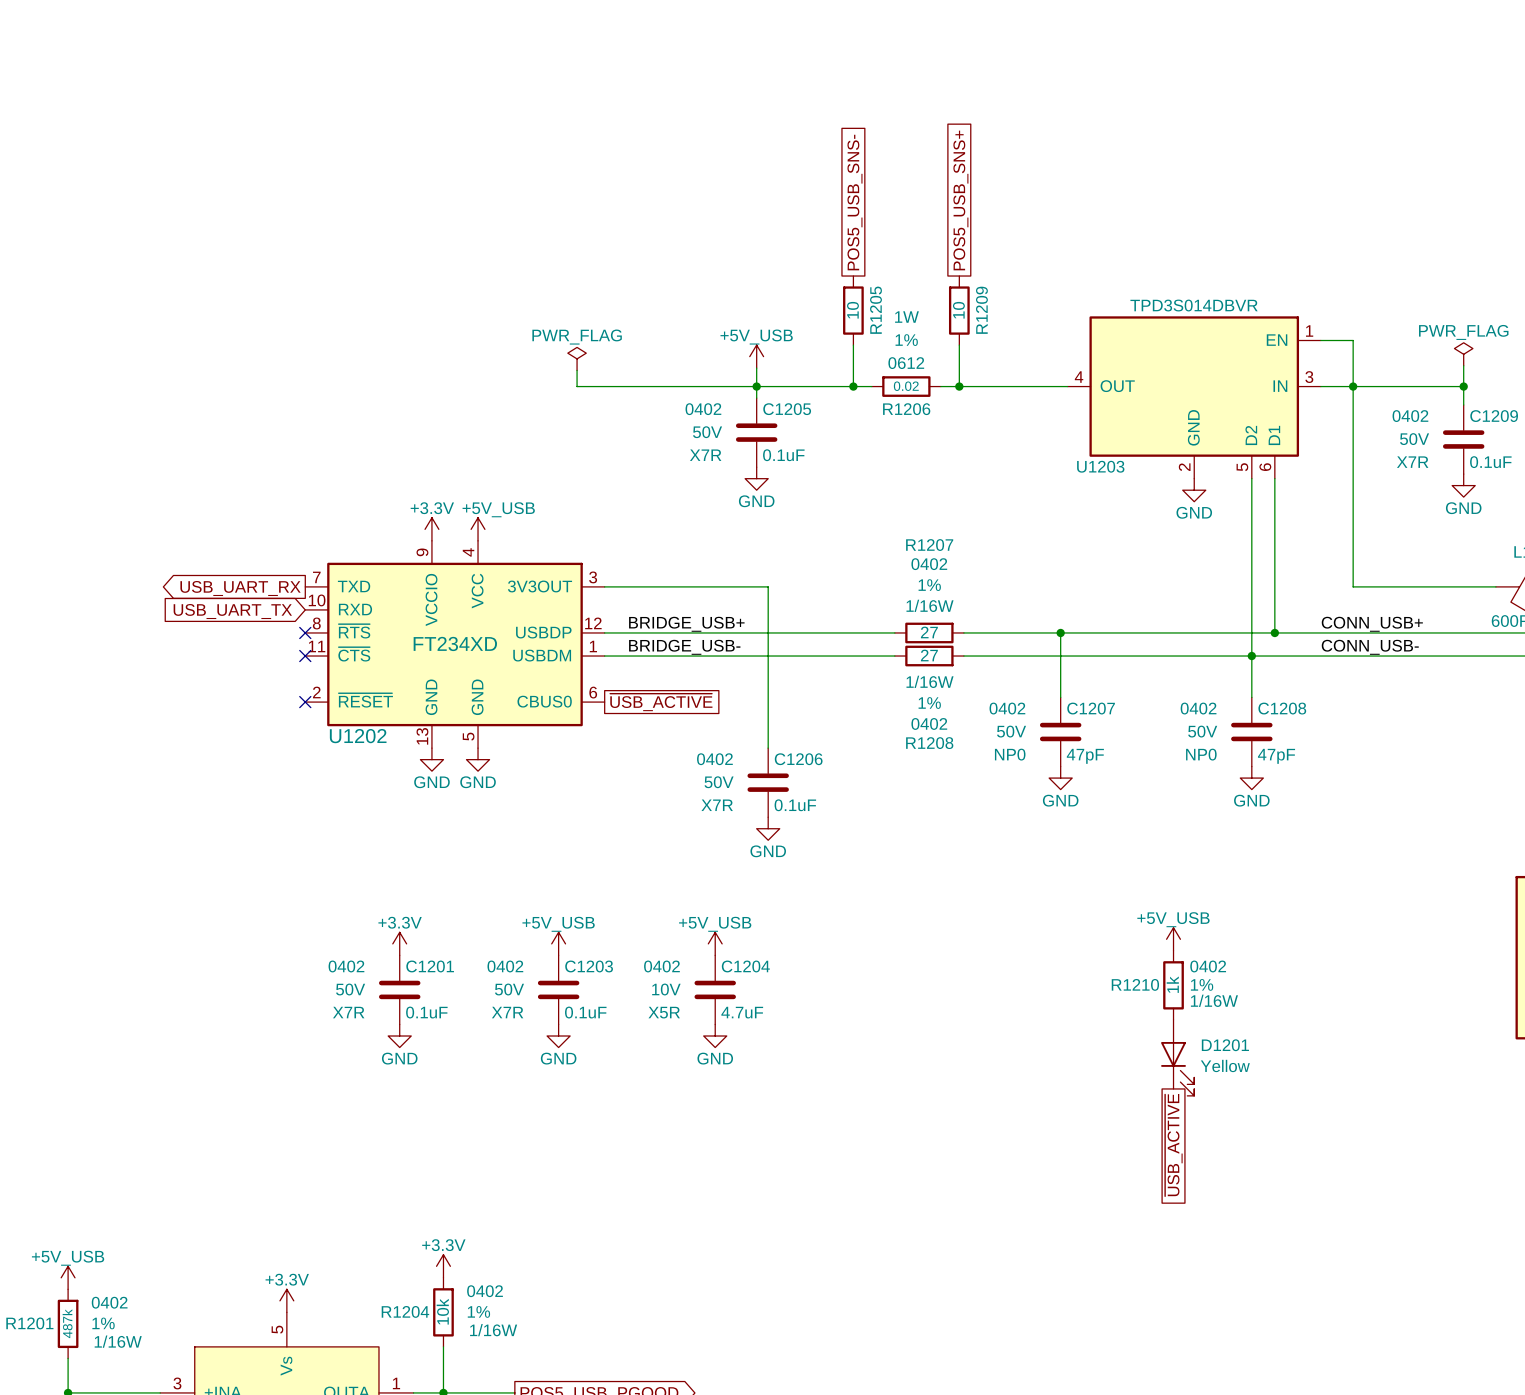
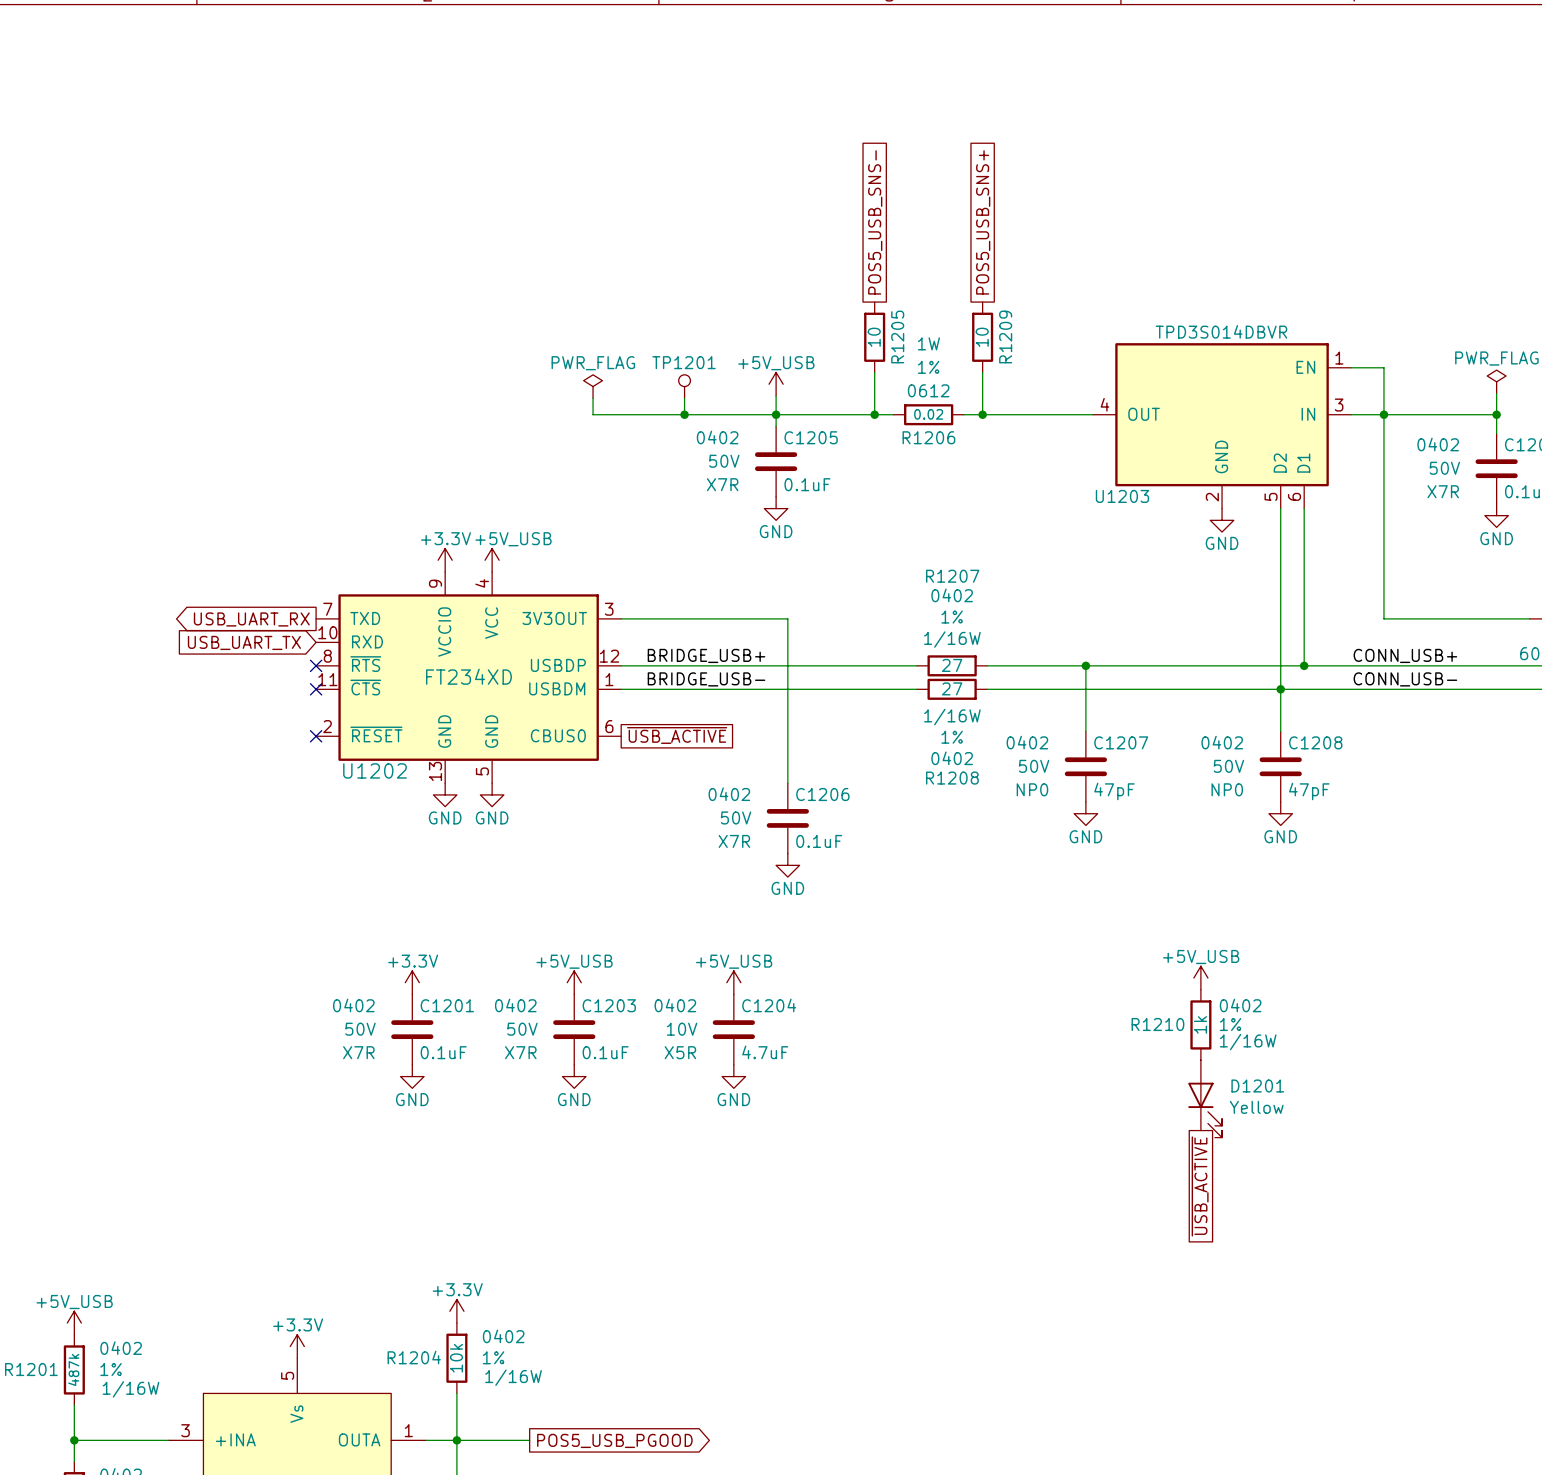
TP1201: none -> (684, 386)
wire: none -> (684, 398) (684, 414)
junction: none -> (684, 414)

